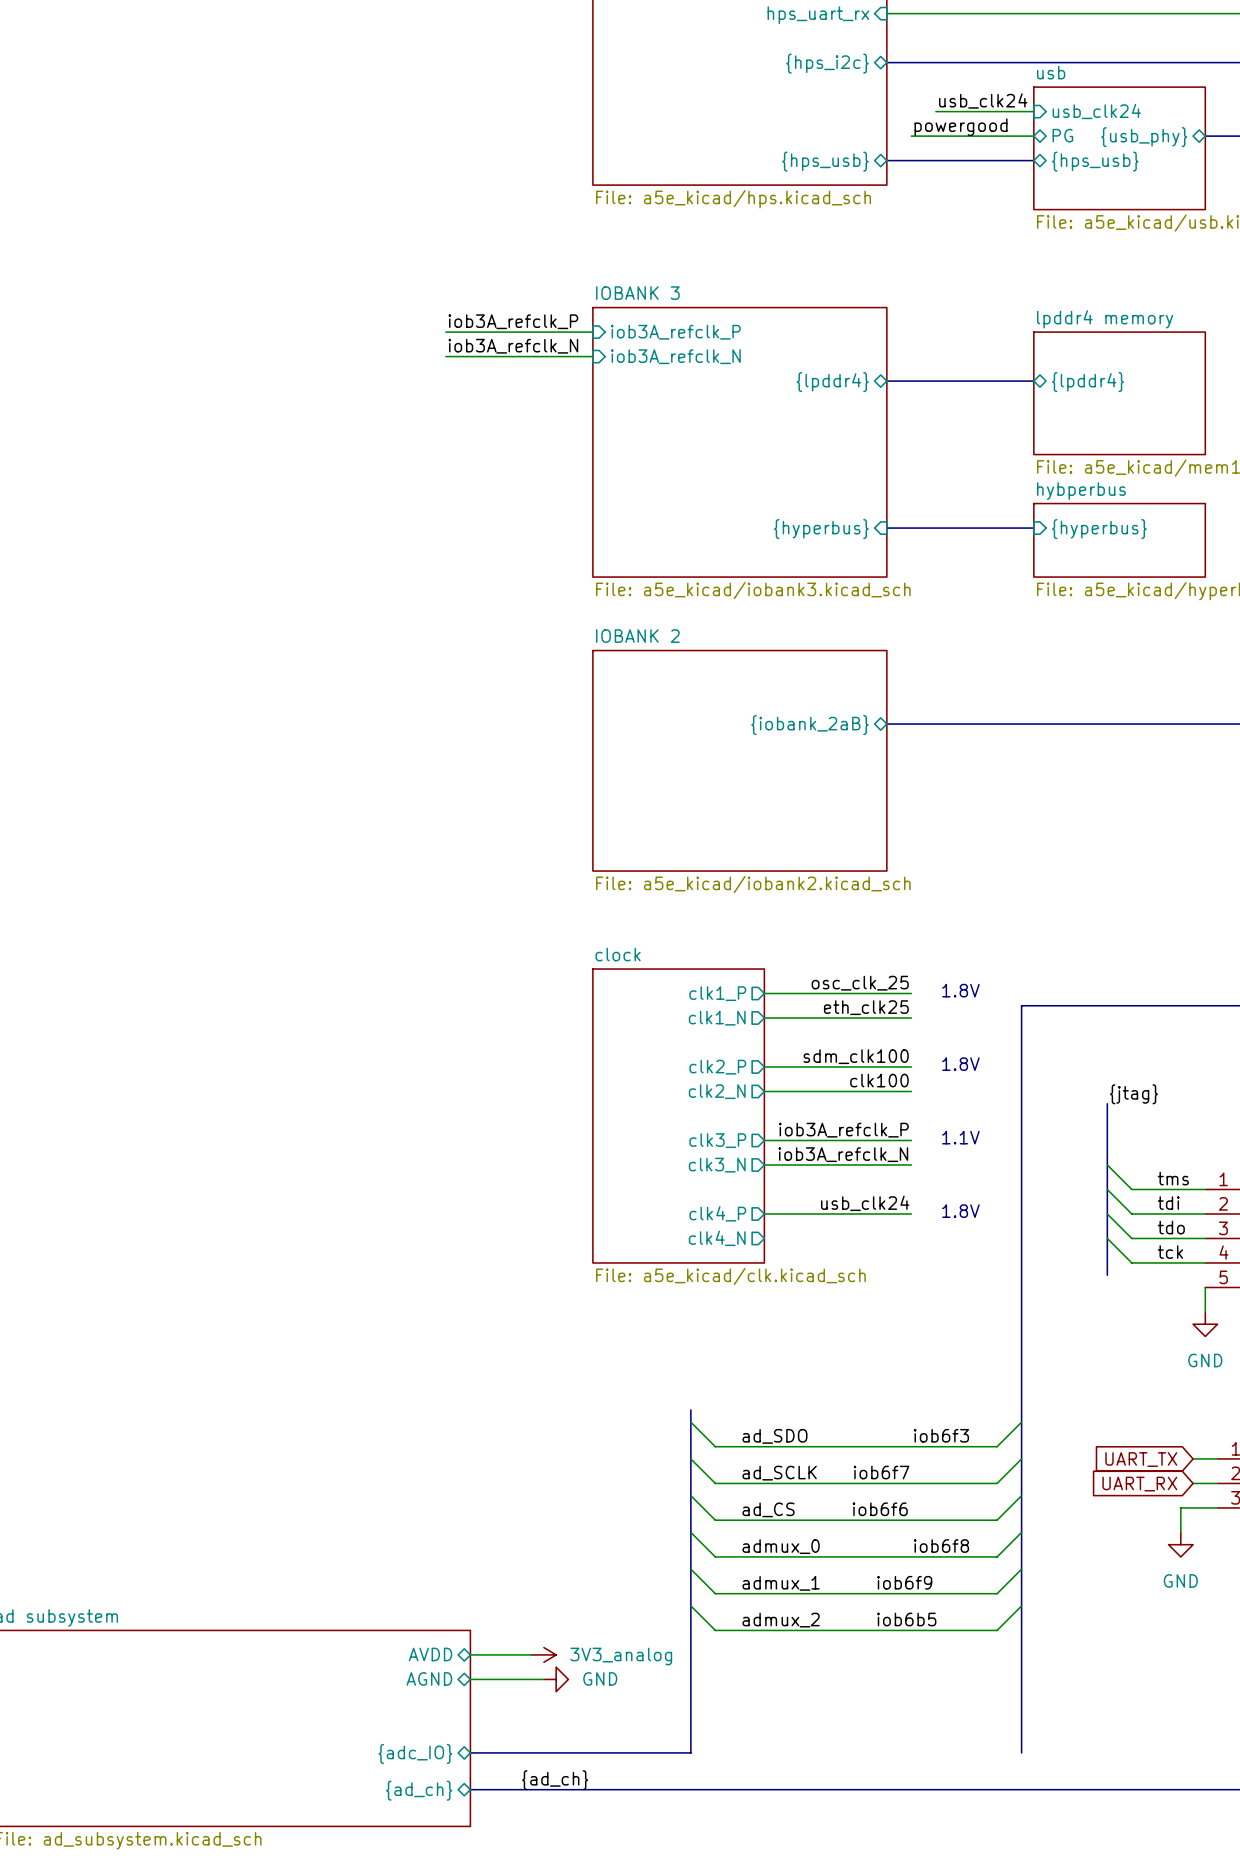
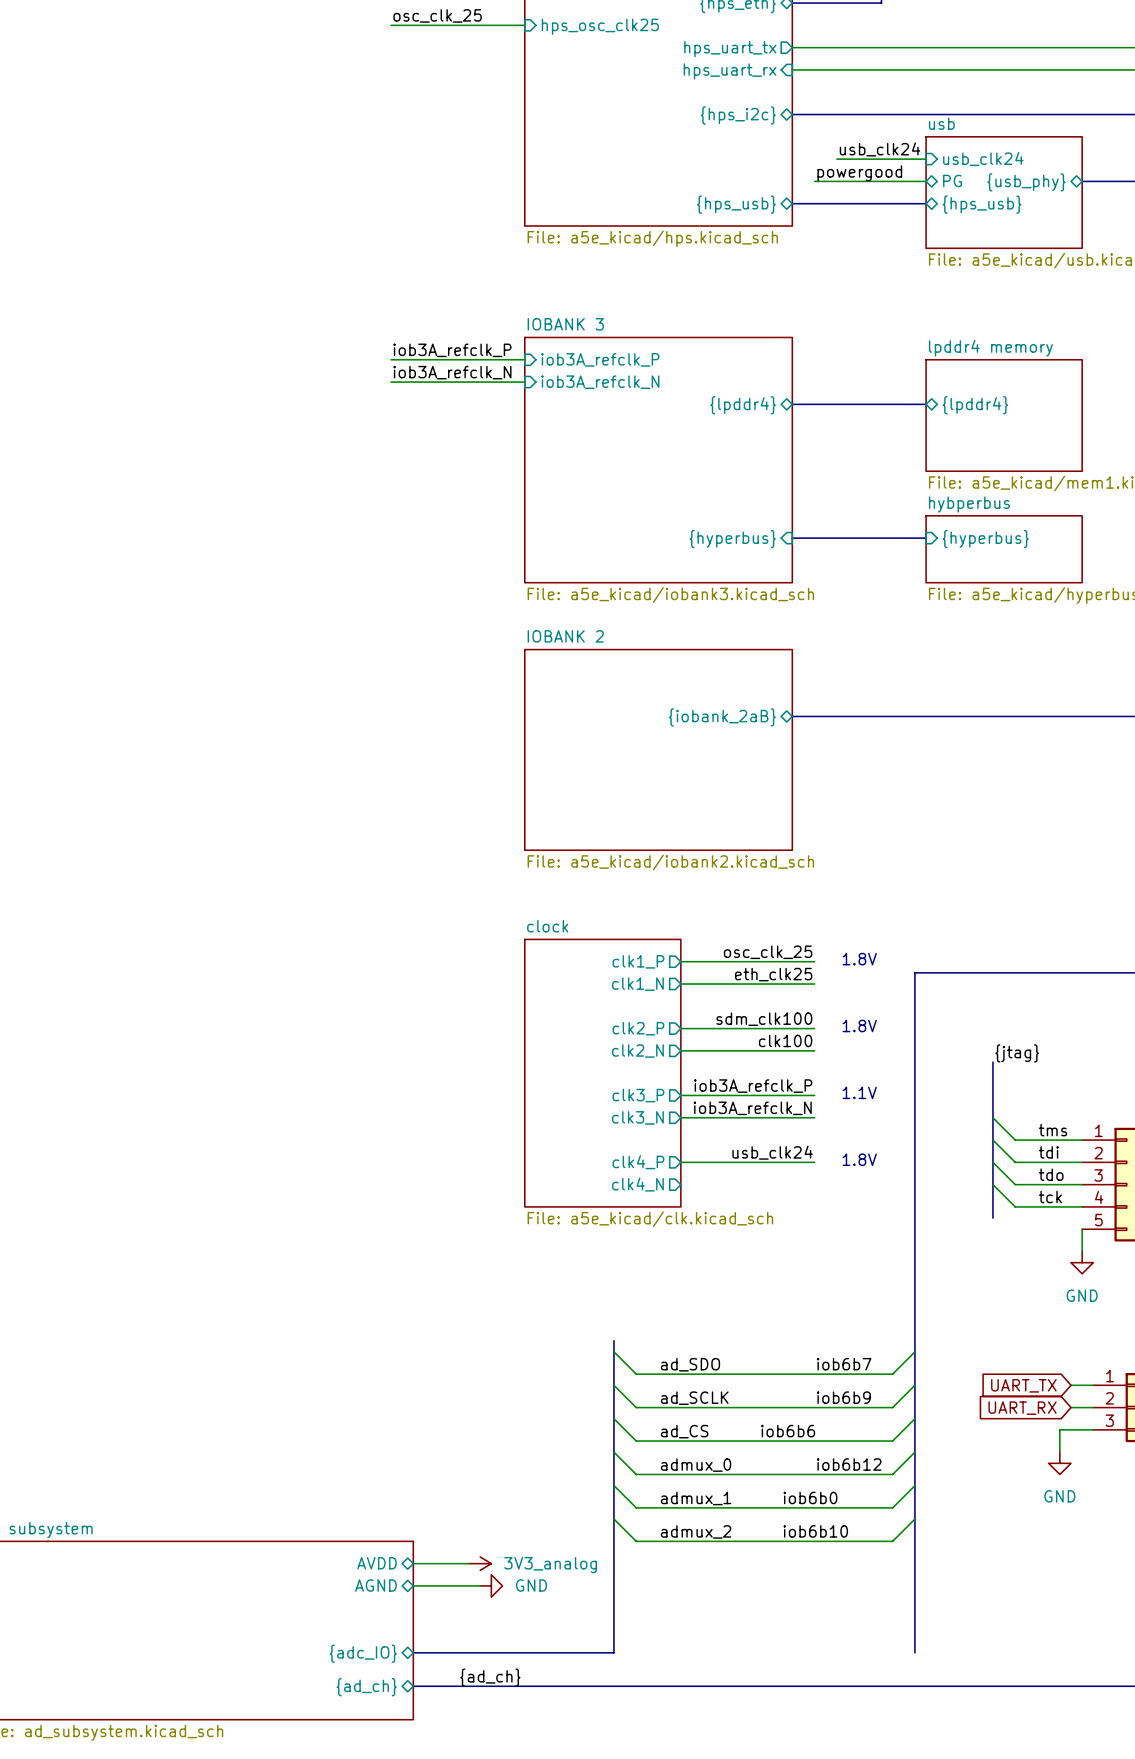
label: iob6f3 (941, 1435) -> iob6b7 (844, 1364)
label: iob6f7 (881, 1472) -> iob6b9 (843, 1397)
label: iob6f6 (880, 1509) -> iob6b6 (788, 1431)
label: iob6f8 (941, 1546) -> iob6b12 (849, 1464)
label: iob6f9 (904, 1582) -> iob6b0 (810, 1497)
label: iob6b5 (906, 1619) -> iob6b10 (815, 1531)

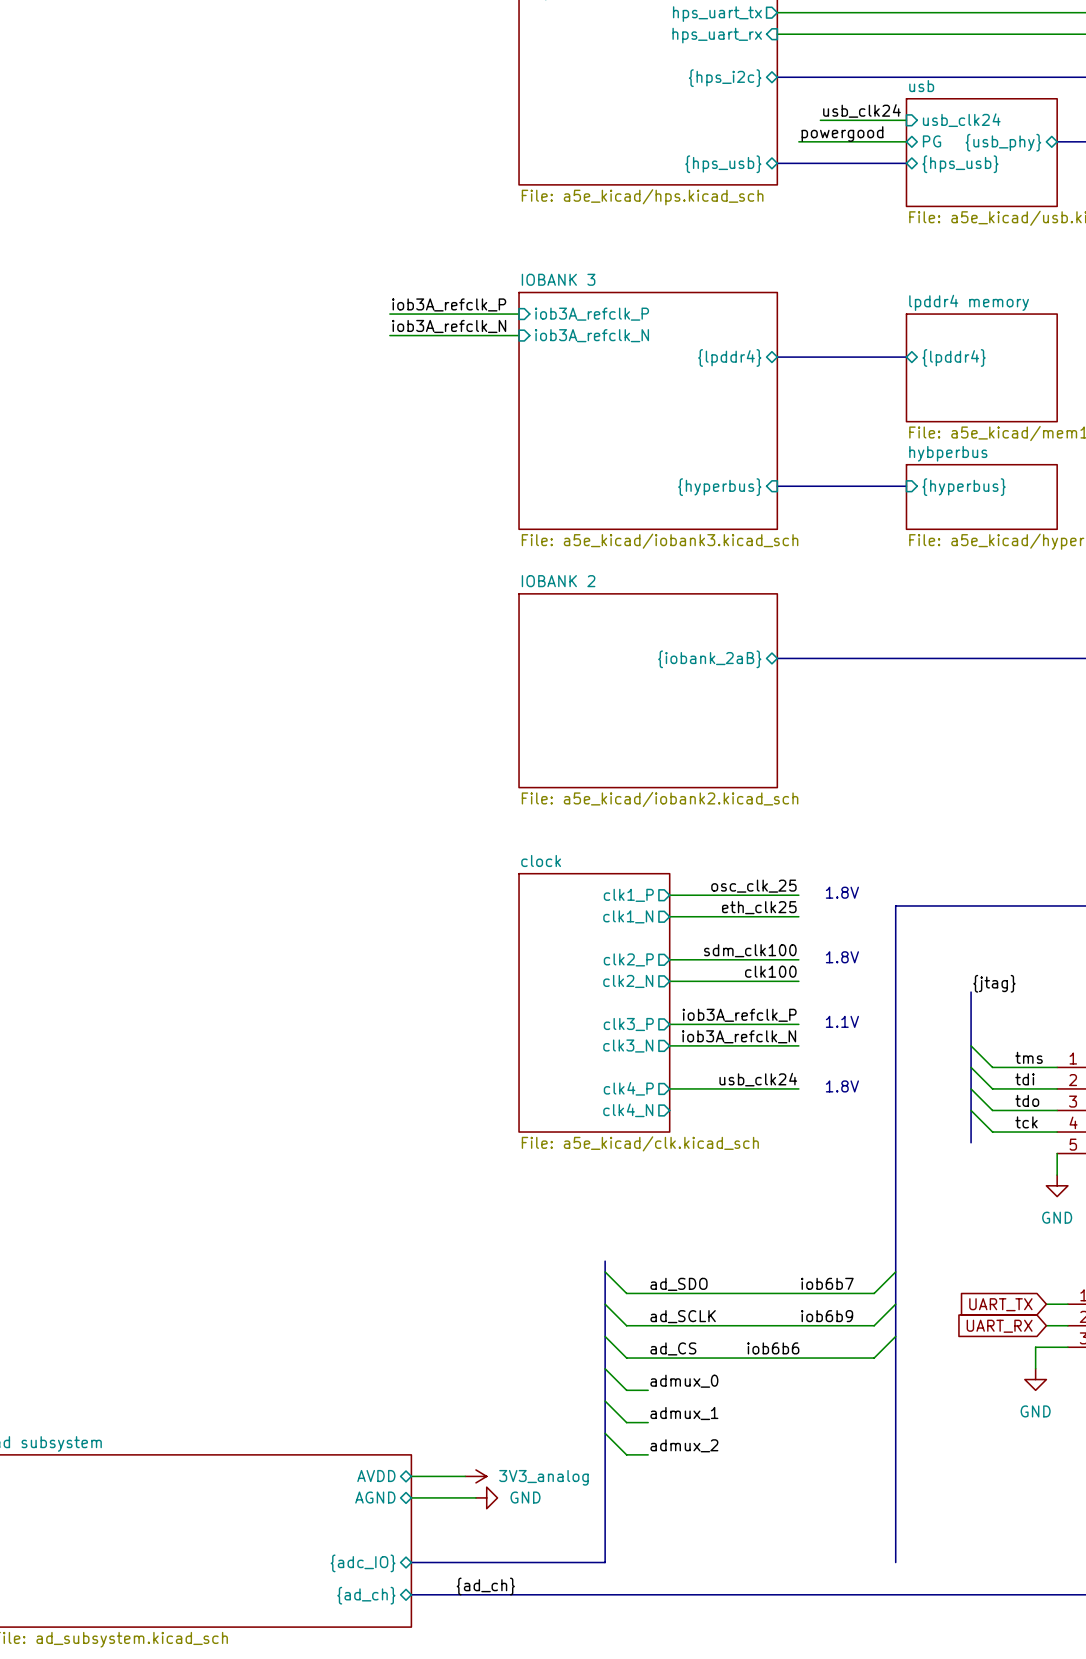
wire: (914, 1452) (892, 1474) (658, 1474) -> none
label: iob6b12 (849, 1464) -> none
wire: (914, 1485) (892, 1507) (658, 1507) -> none
label: iob6b0 (810, 1497) -> none
wire: (914, 1519) (892, 1541) (658, 1541) -> none
label: iob6b10 (815, 1531) -> none

